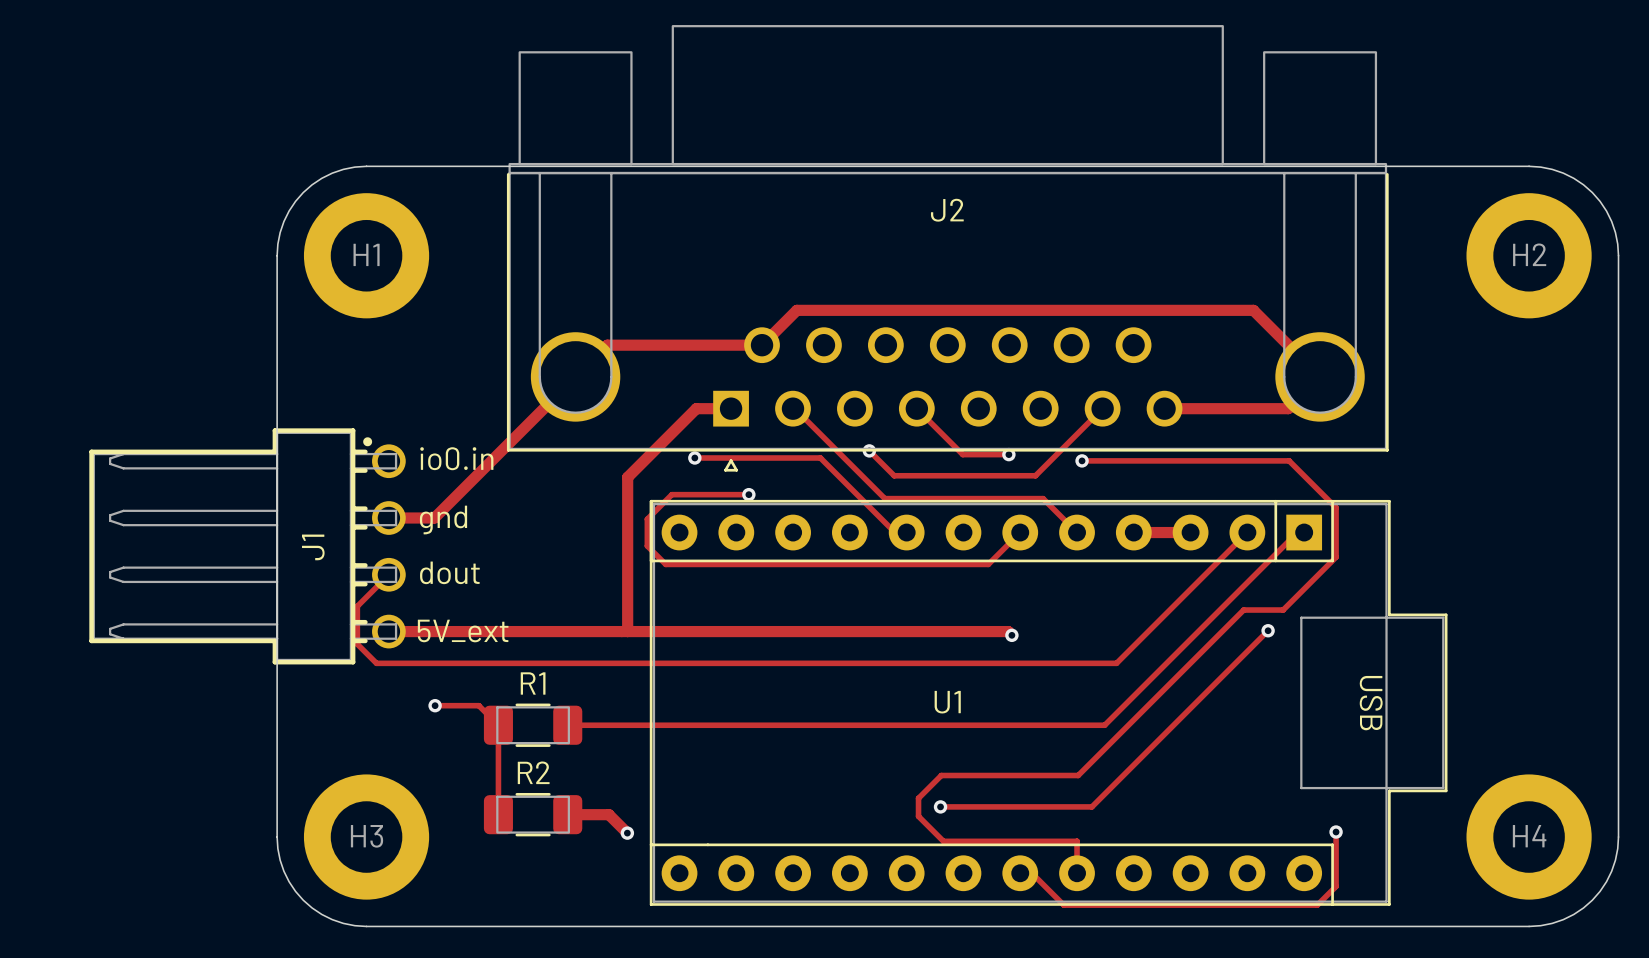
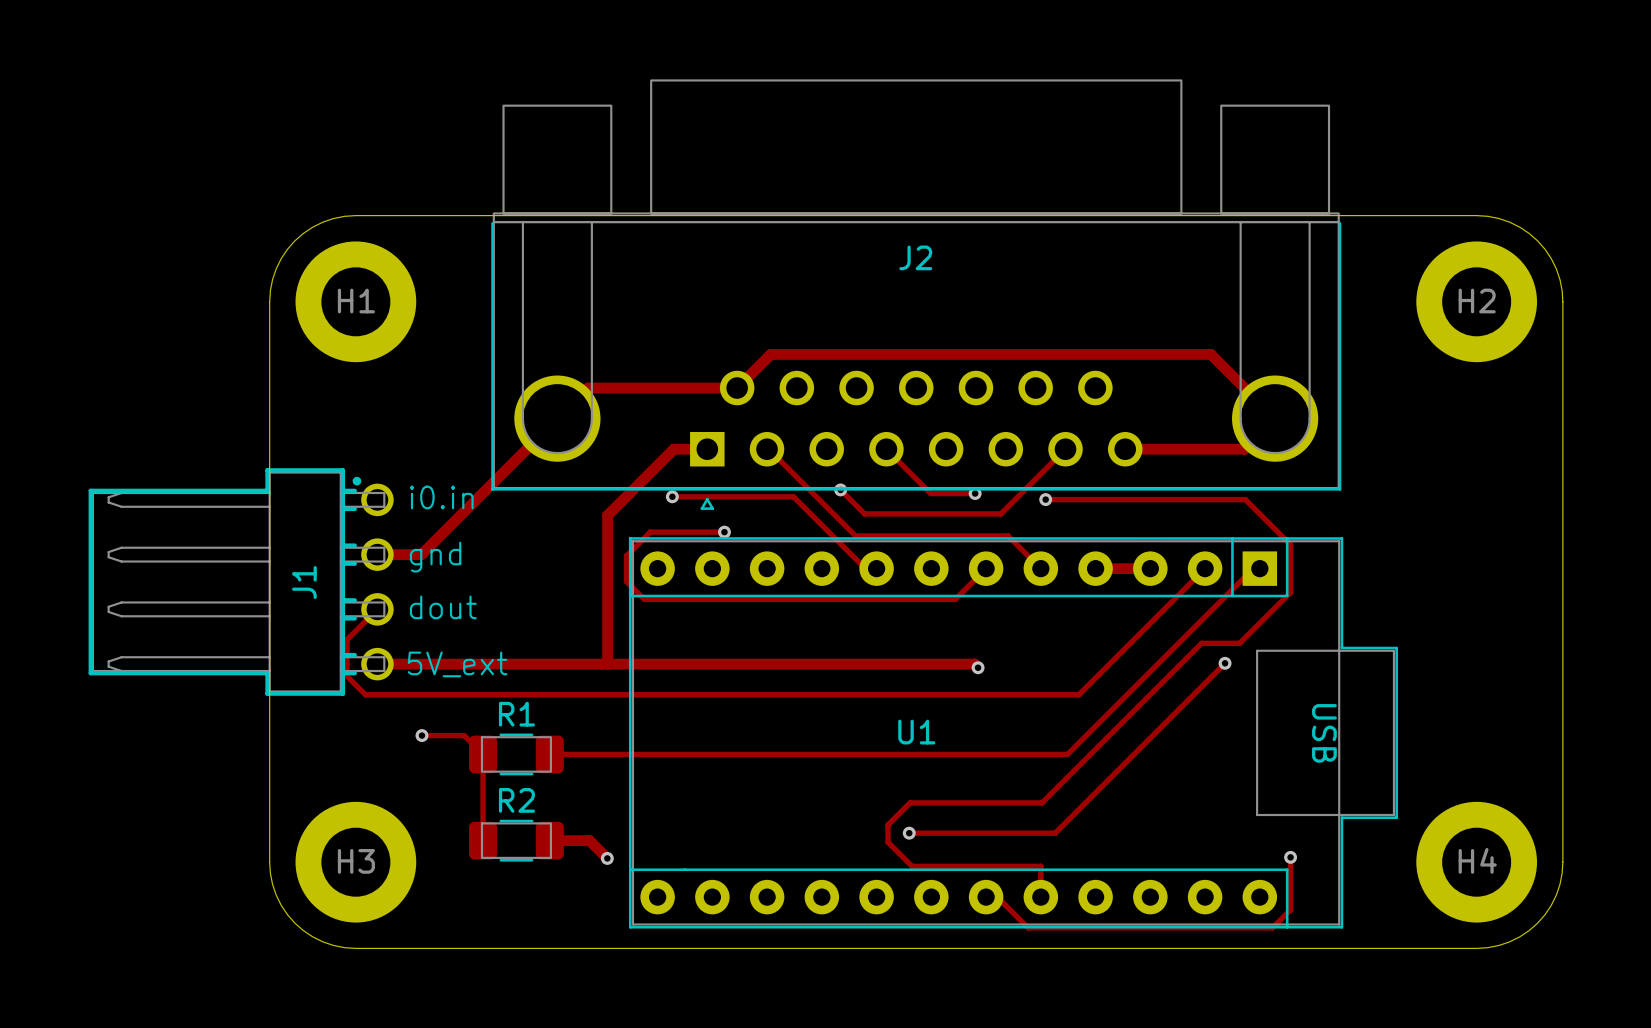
text: io0.in (456, 458) -> i0.in (441, 497)

